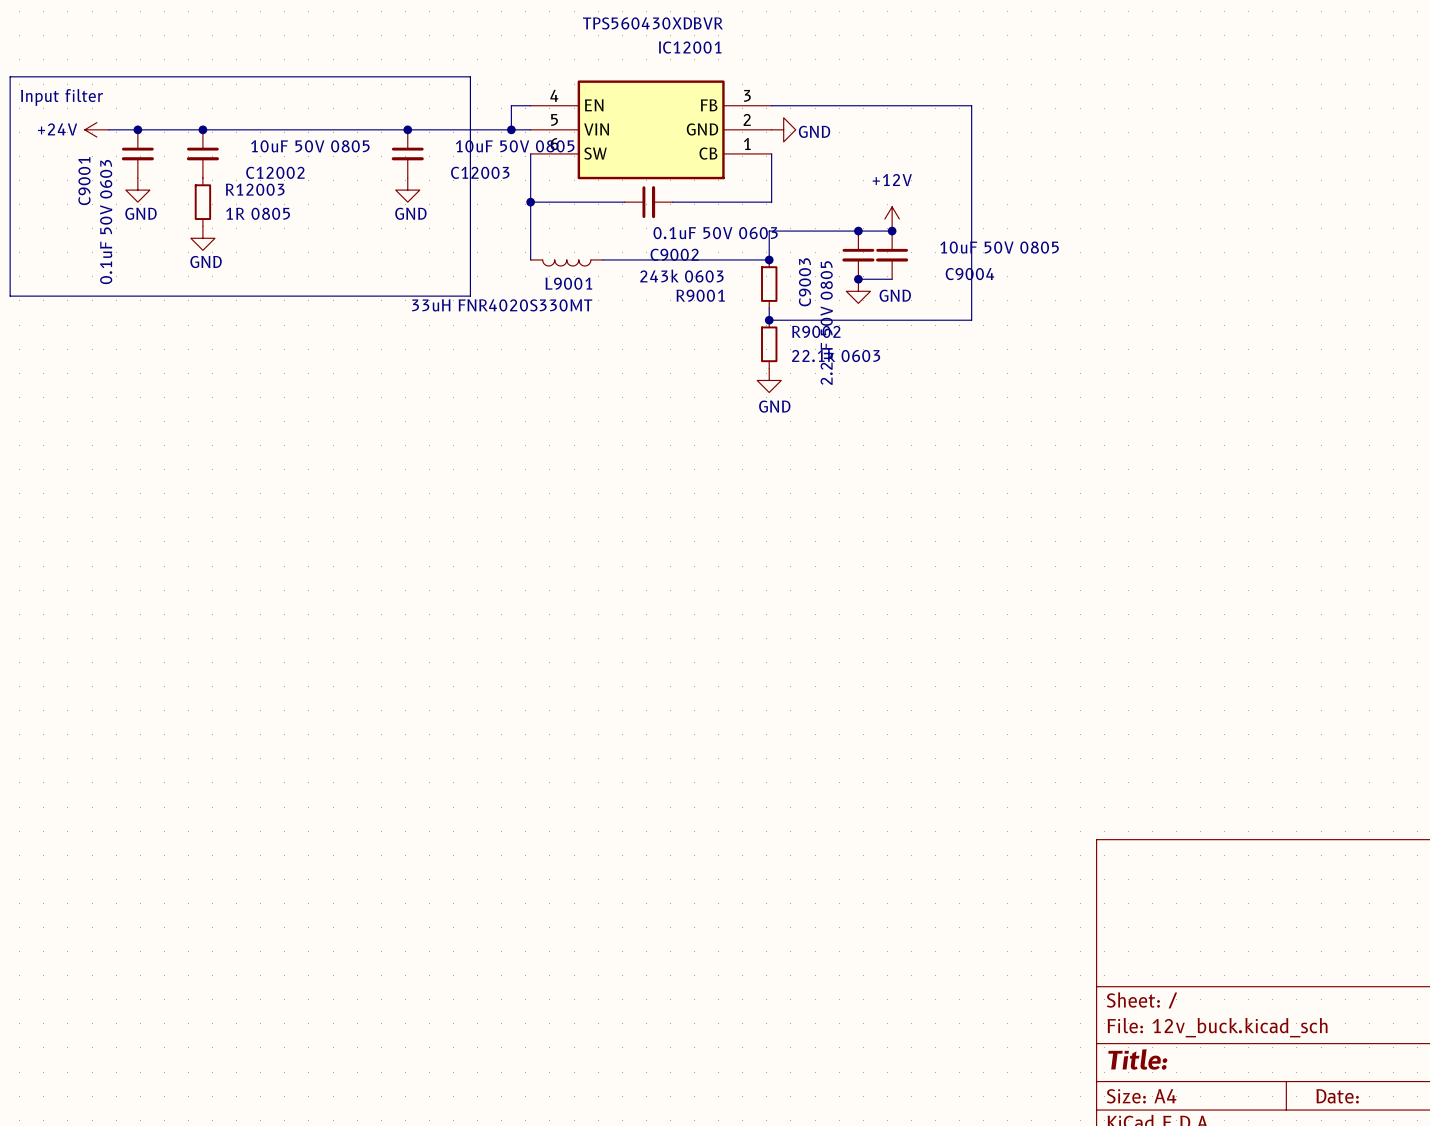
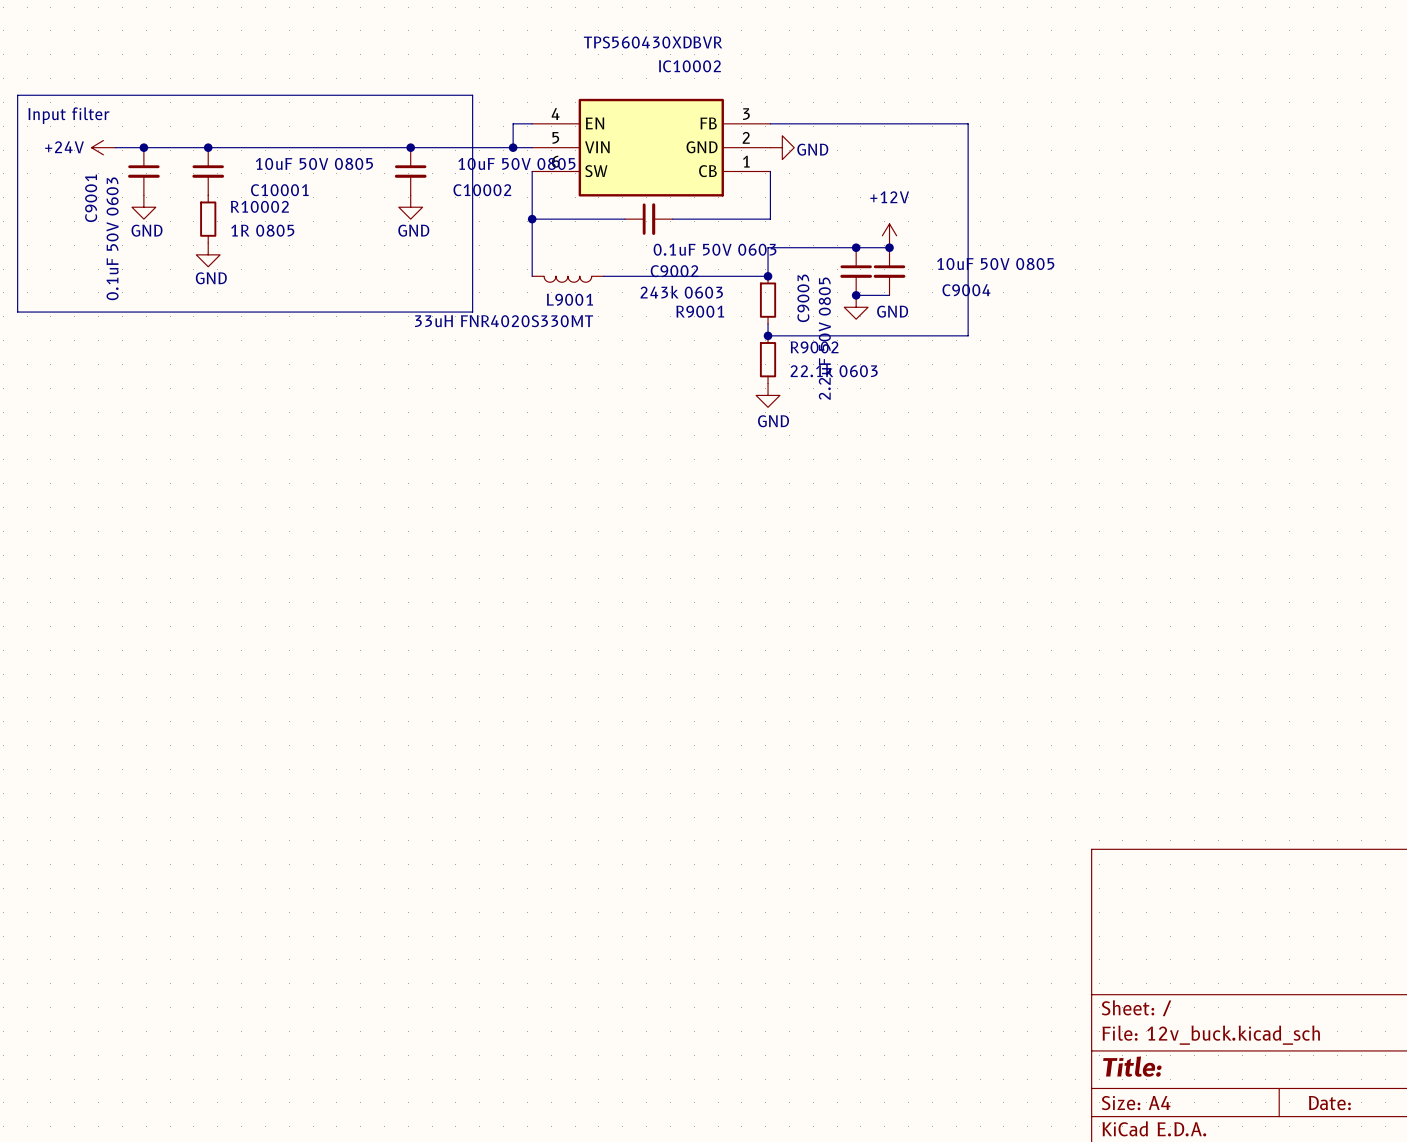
IC12001 name: IC12001 (690, 47) -> IC10002 (689, 66)
C12002 name: C12002 (275, 172) -> C10001 (279, 190)
C12003 name: C12003 (480, 172) -> C10002 (482, 190)
R12003 name: R12003 (255, 189) -> R10002 (259, 206)

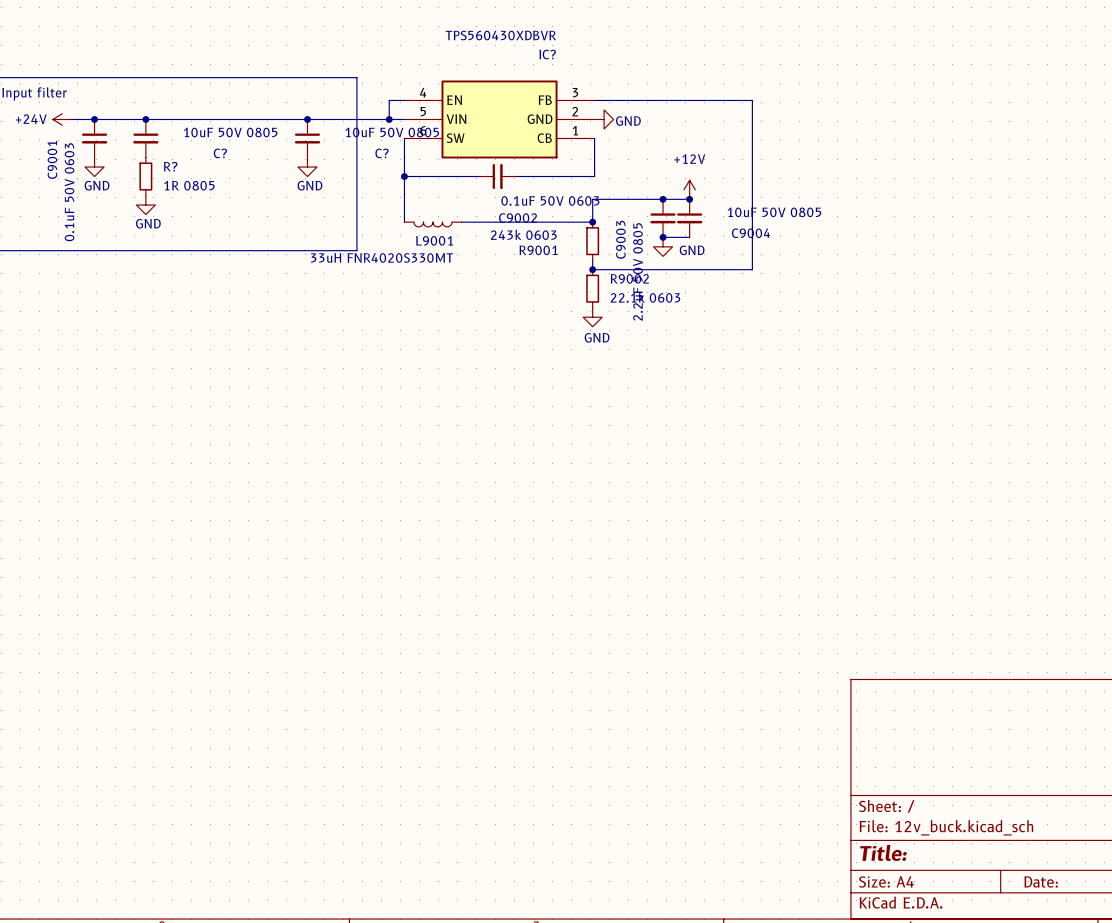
IC10002 name: IC10002 (689, 66) -> IC? (547, 54)
C10001 name: C10001 (279, 190) -> C? (220, 153)
C10002 name: C10002 (482, 190) -> C? (382, 153)
R10002 name: R10002 (259, 206) -> R? (170, 166)

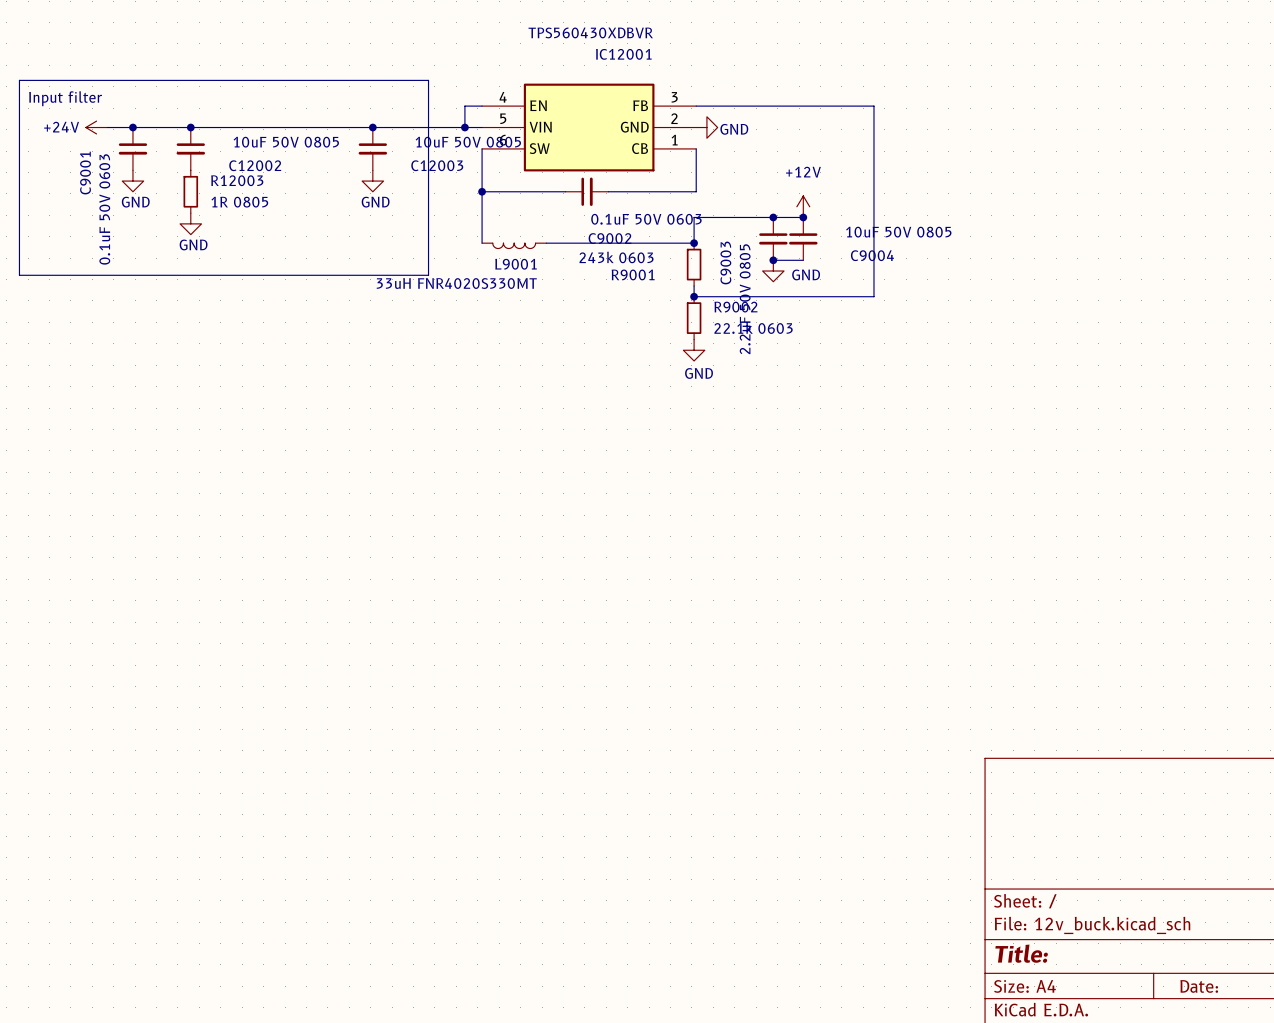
IC? name: IC? (547, 54) -> IC12001 (623, 54)
C? name: C? (220, 153) -> C12002 (255, 165)
C? name: C? (382, 153) -> C12003 (437, 165)
R? name: R? (170, 166) -> R12003 (237, 180)

